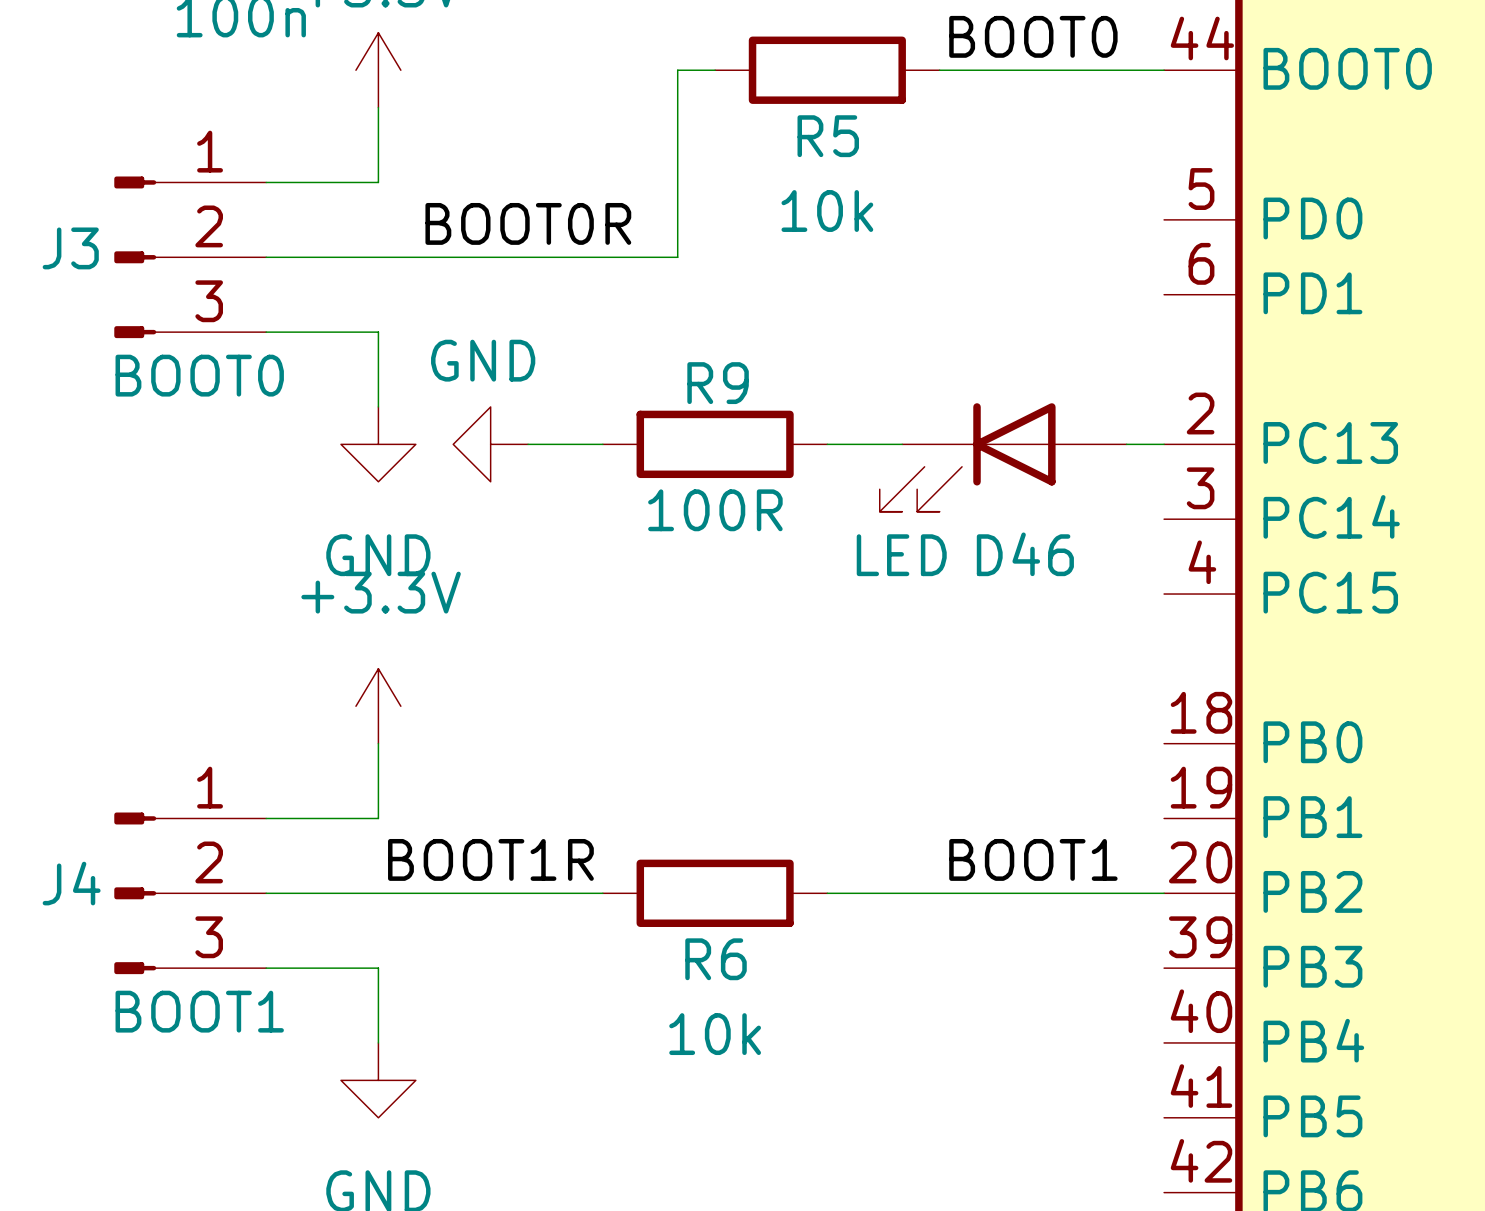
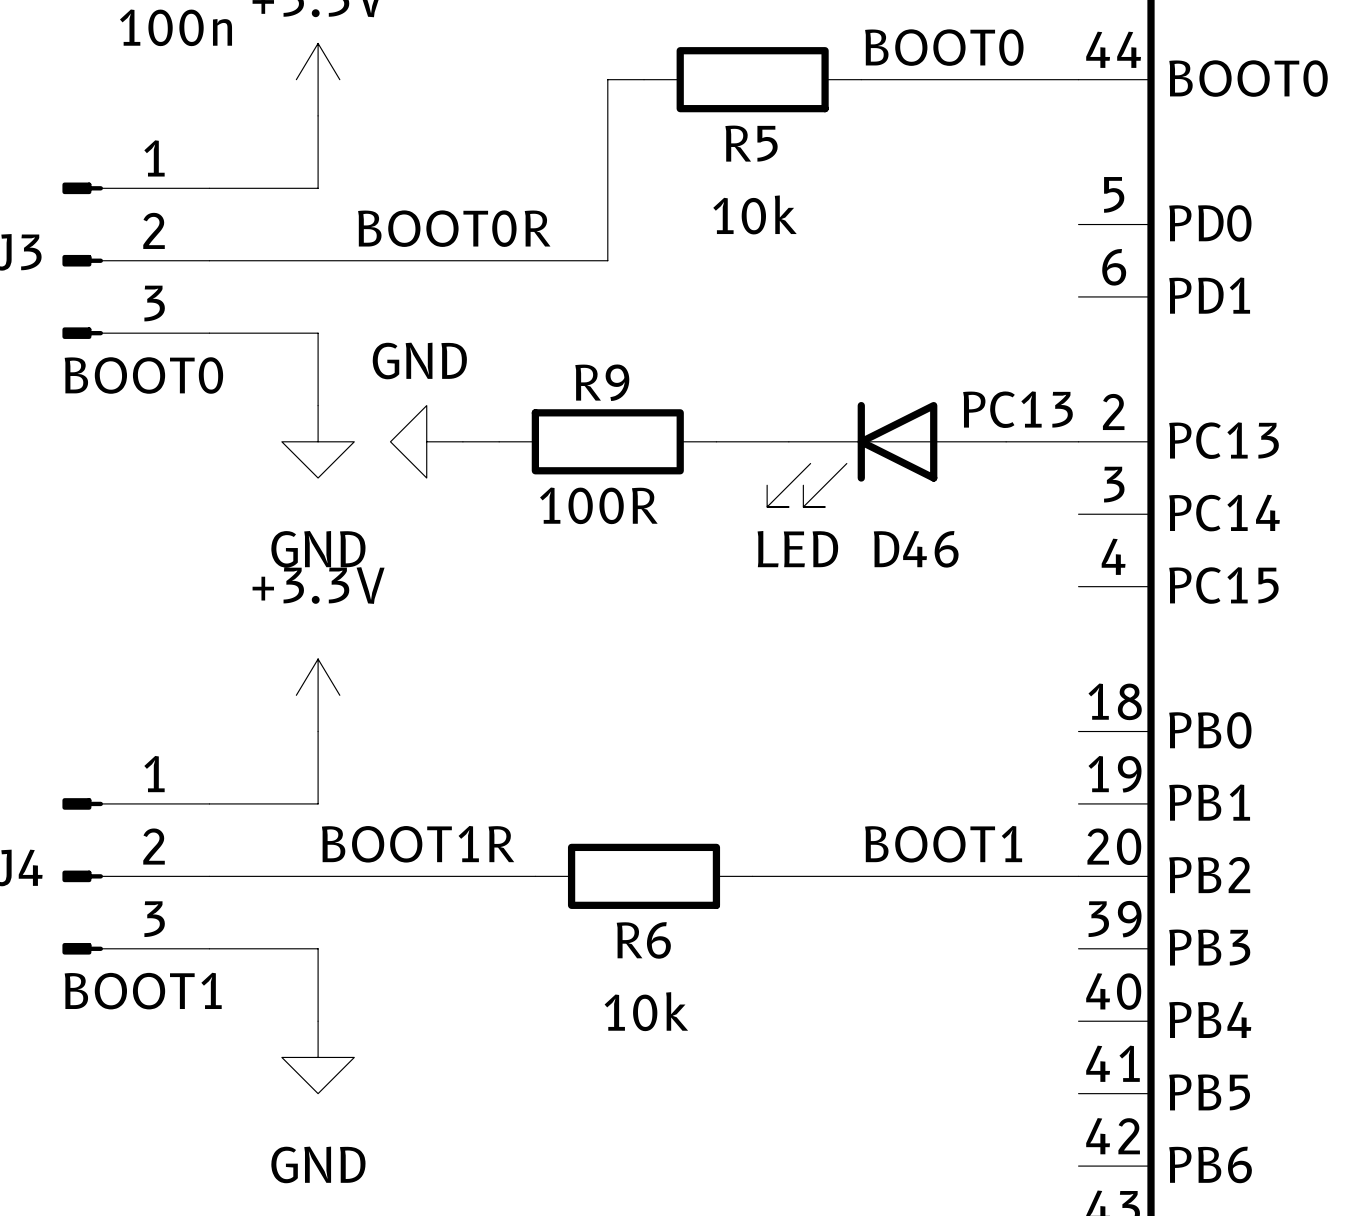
label: none -> PC13 (1017, 409)
R9 position: (715, 444) -> (607, 441)
D46 position: (1003, 457) -> (886, 454)

